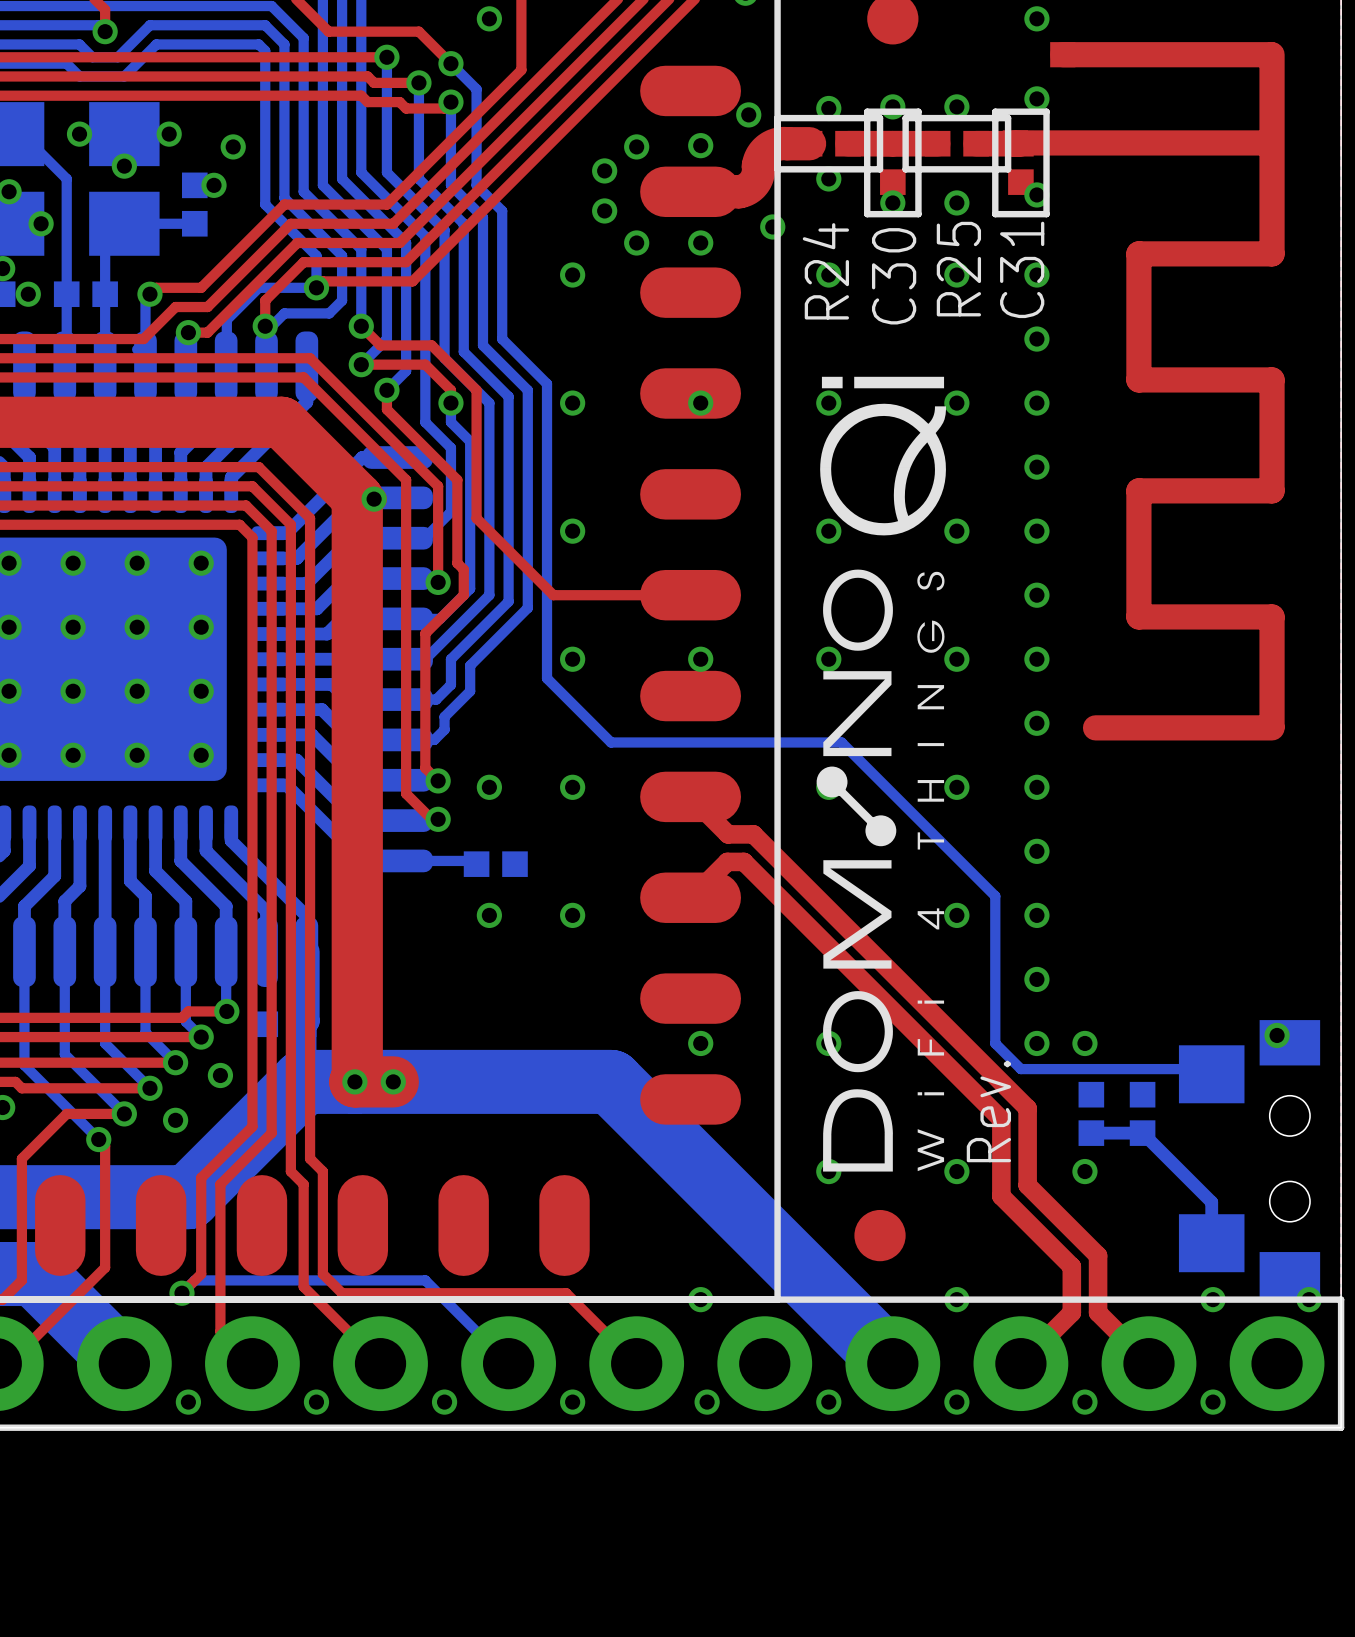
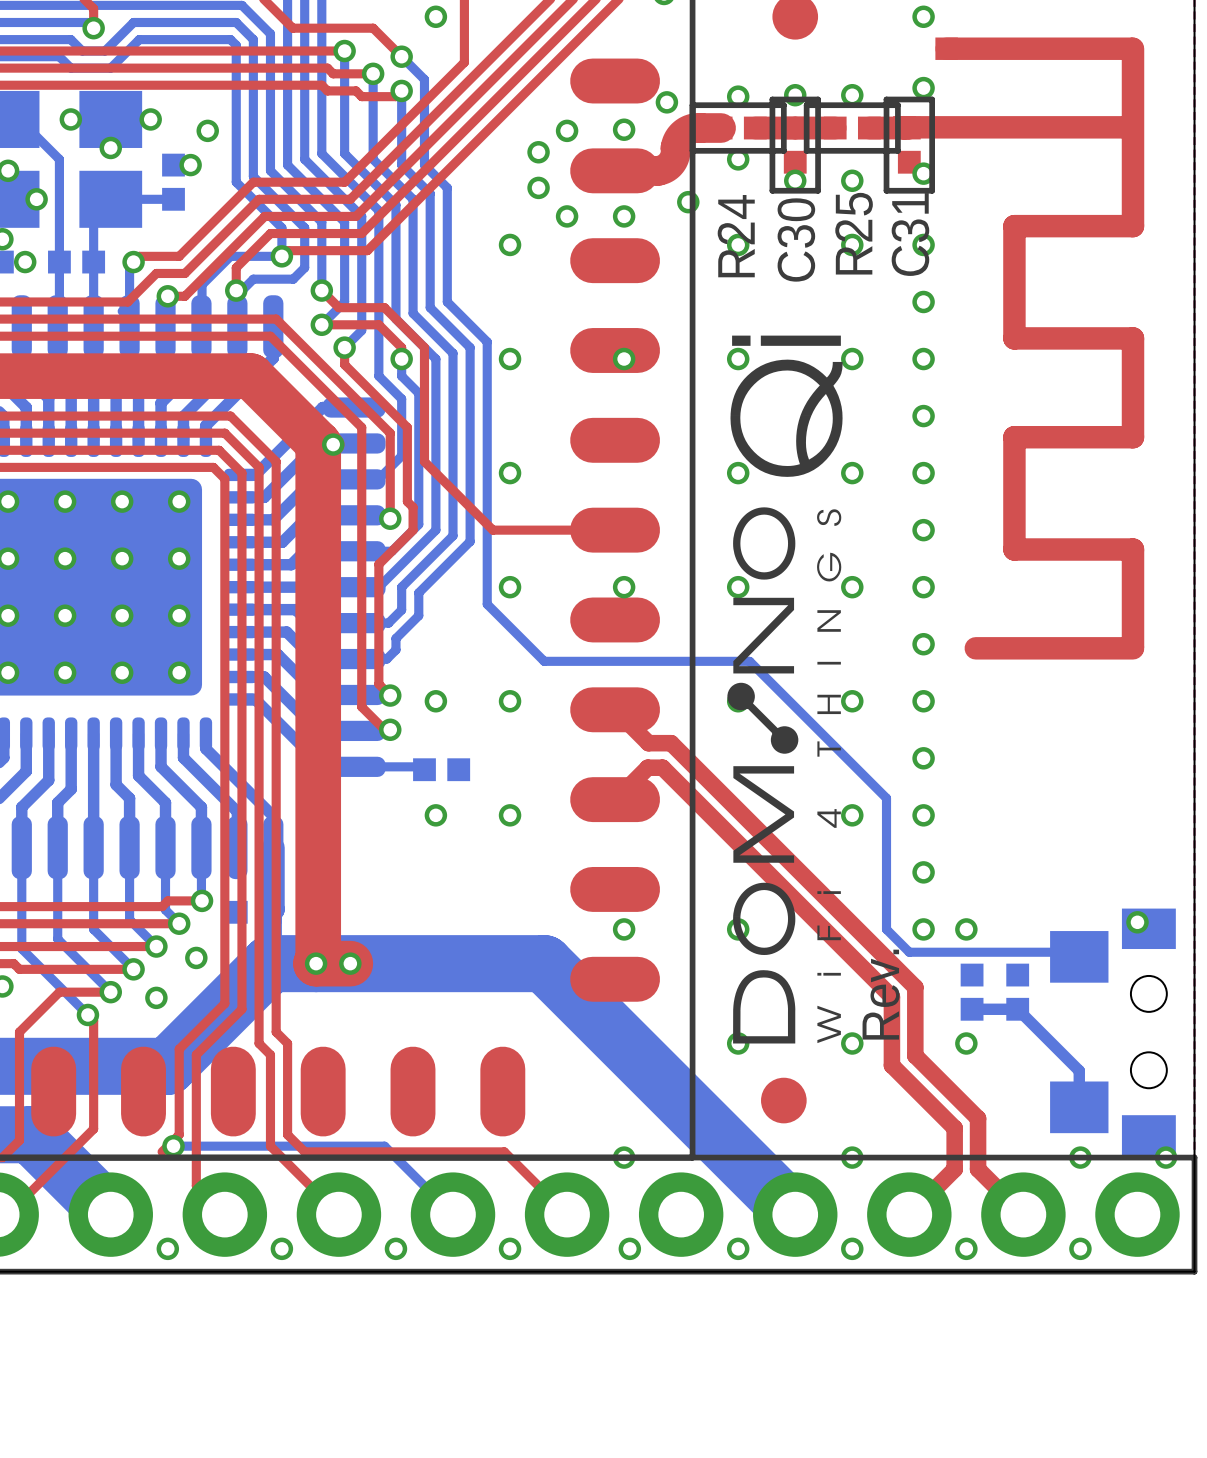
bottom track: (431, 1286) (425, 1280) (194, 1280) (181, 1293) -> (384, 1146) (173, 1146)
via position: (181, 1293) -> (173, 1146)

